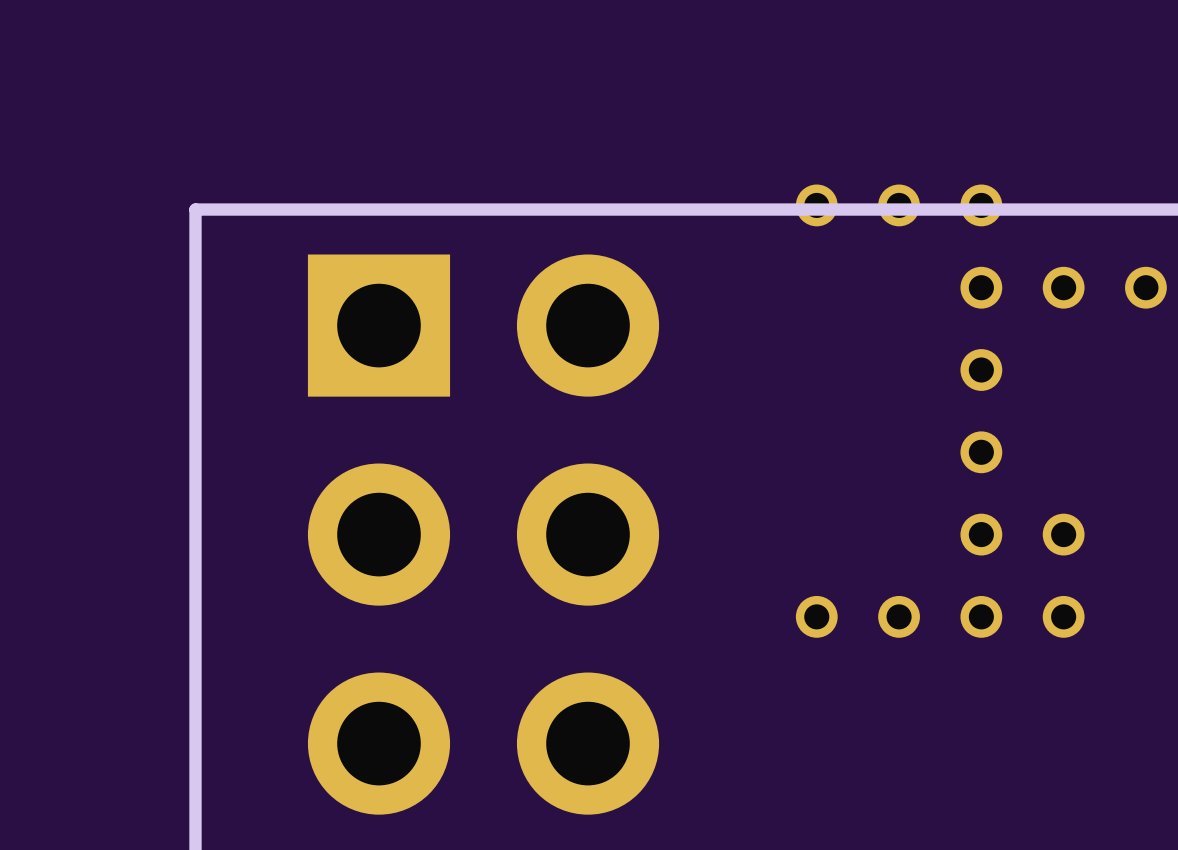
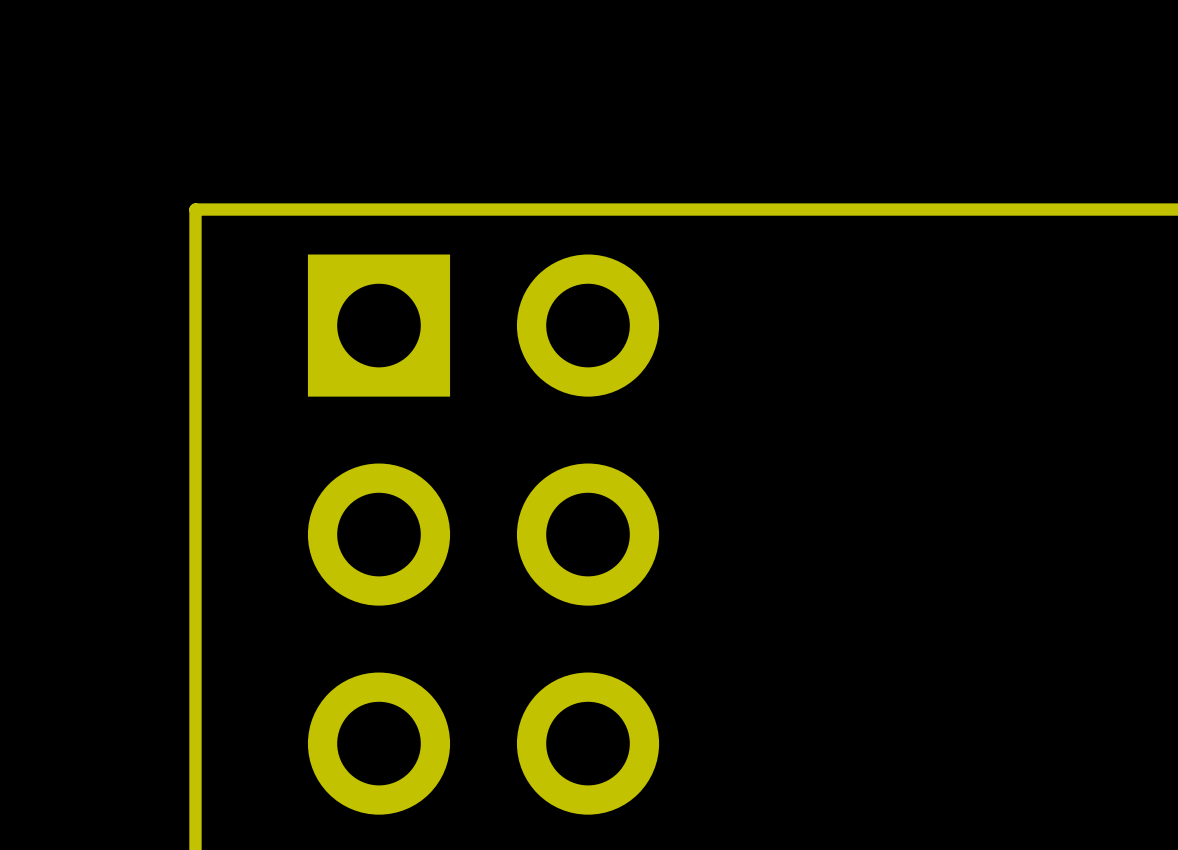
part: (816, 205) -> none
part: (899, 205) -> none
part: (981, 205) -> none
part: (981, 287) -> none
part: (1063, 287) -> none
part: (1145, 287) -> none
part: (981, 370) -> none
part: (981, 452) -> none
part: (981, 534) -> none
part: (1063, 534) -> none
part: (816, 616) -> none
part: (899, 616) -> none
part: (981, 616) -> none
part: (1063, 616) -> none

